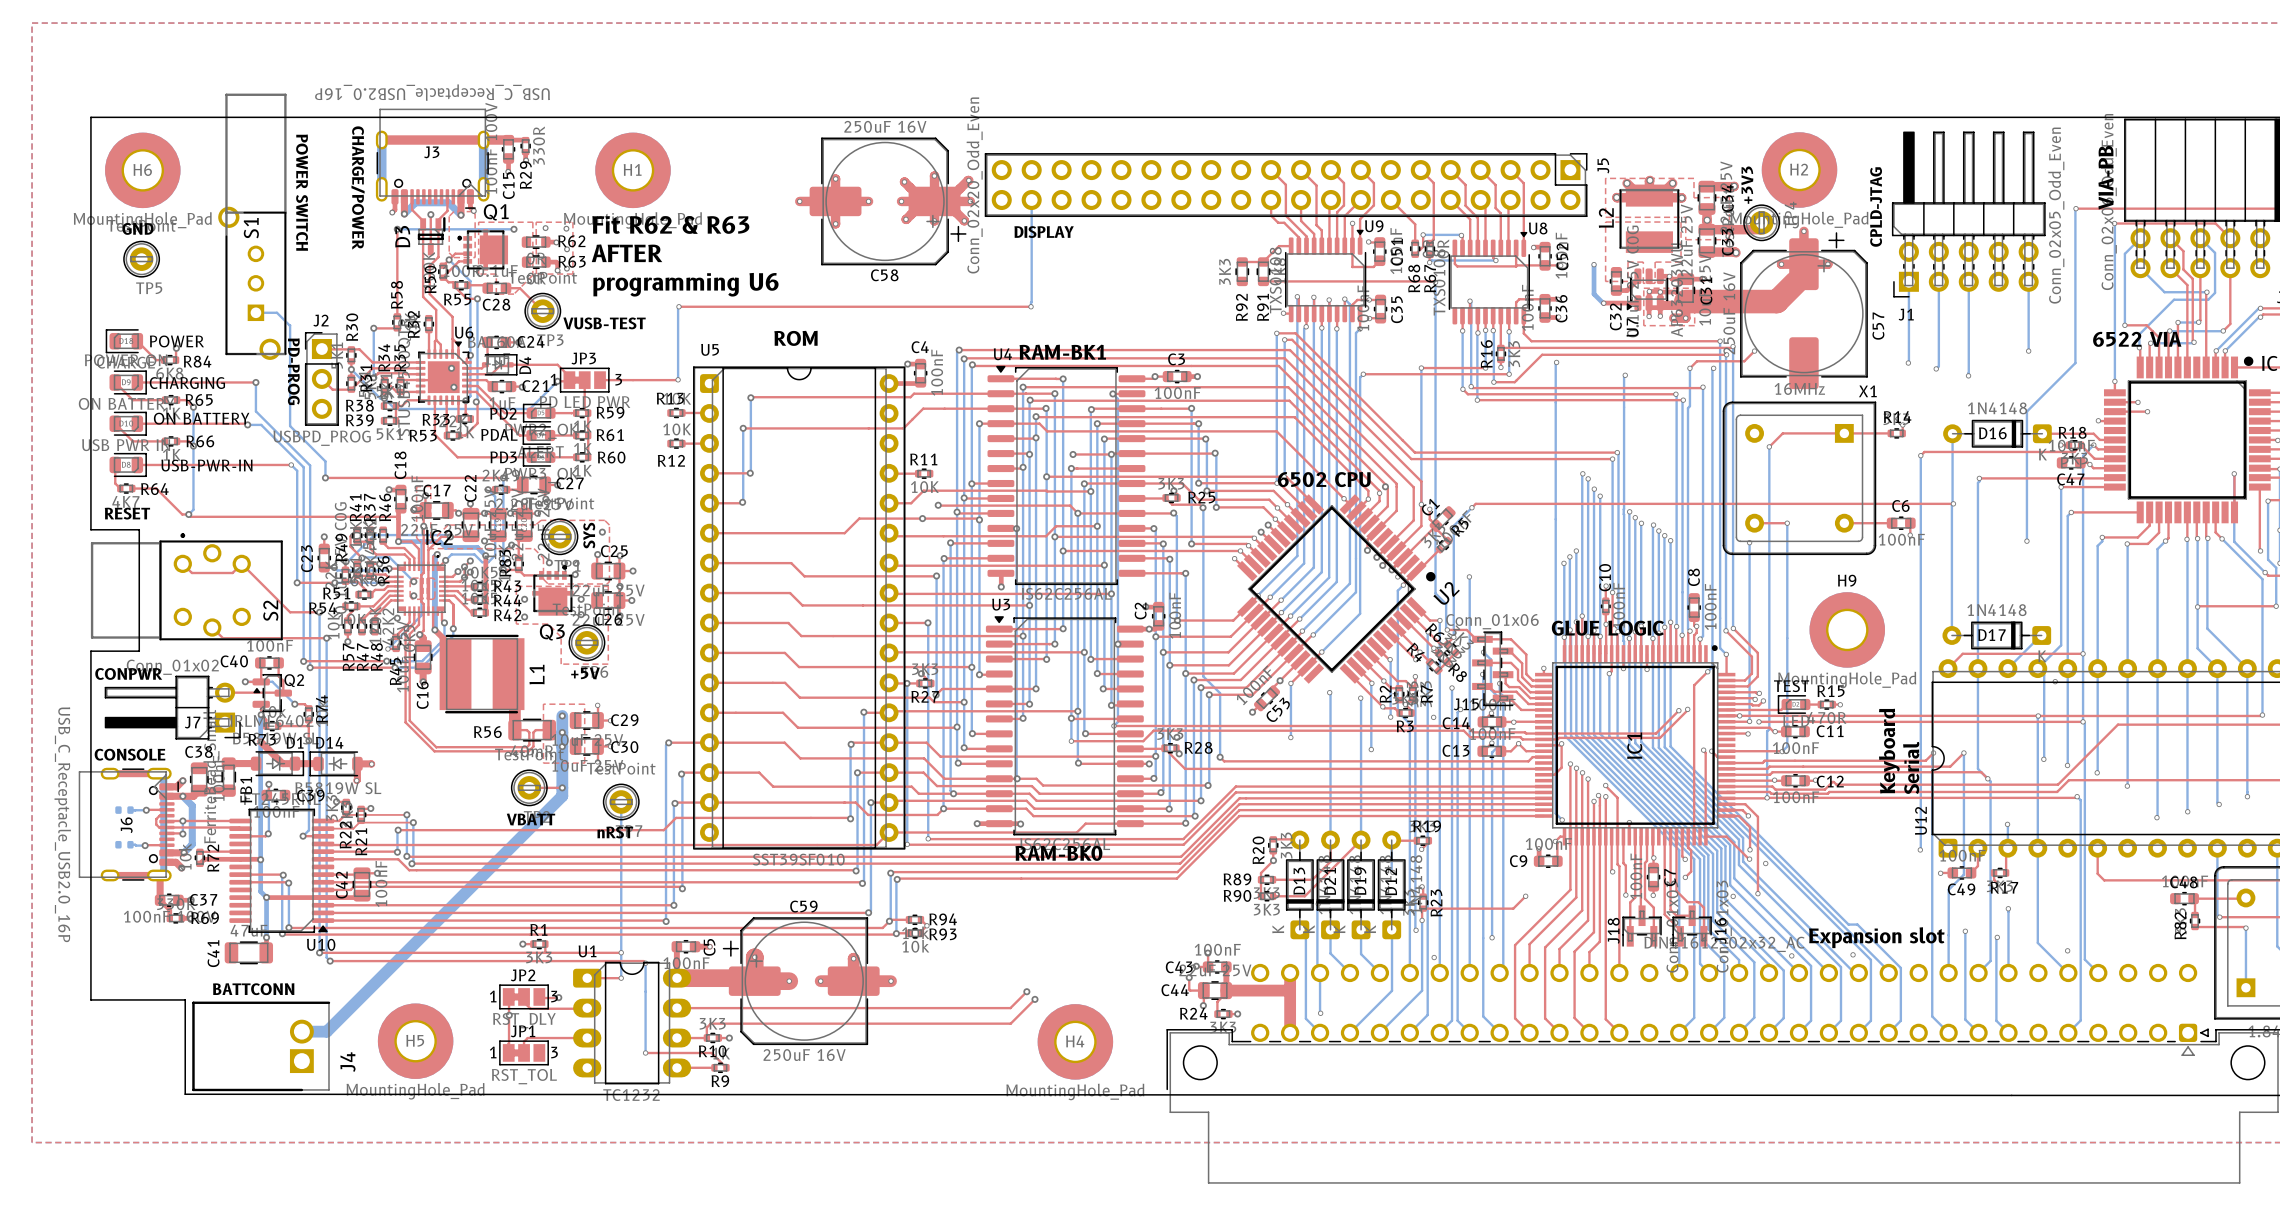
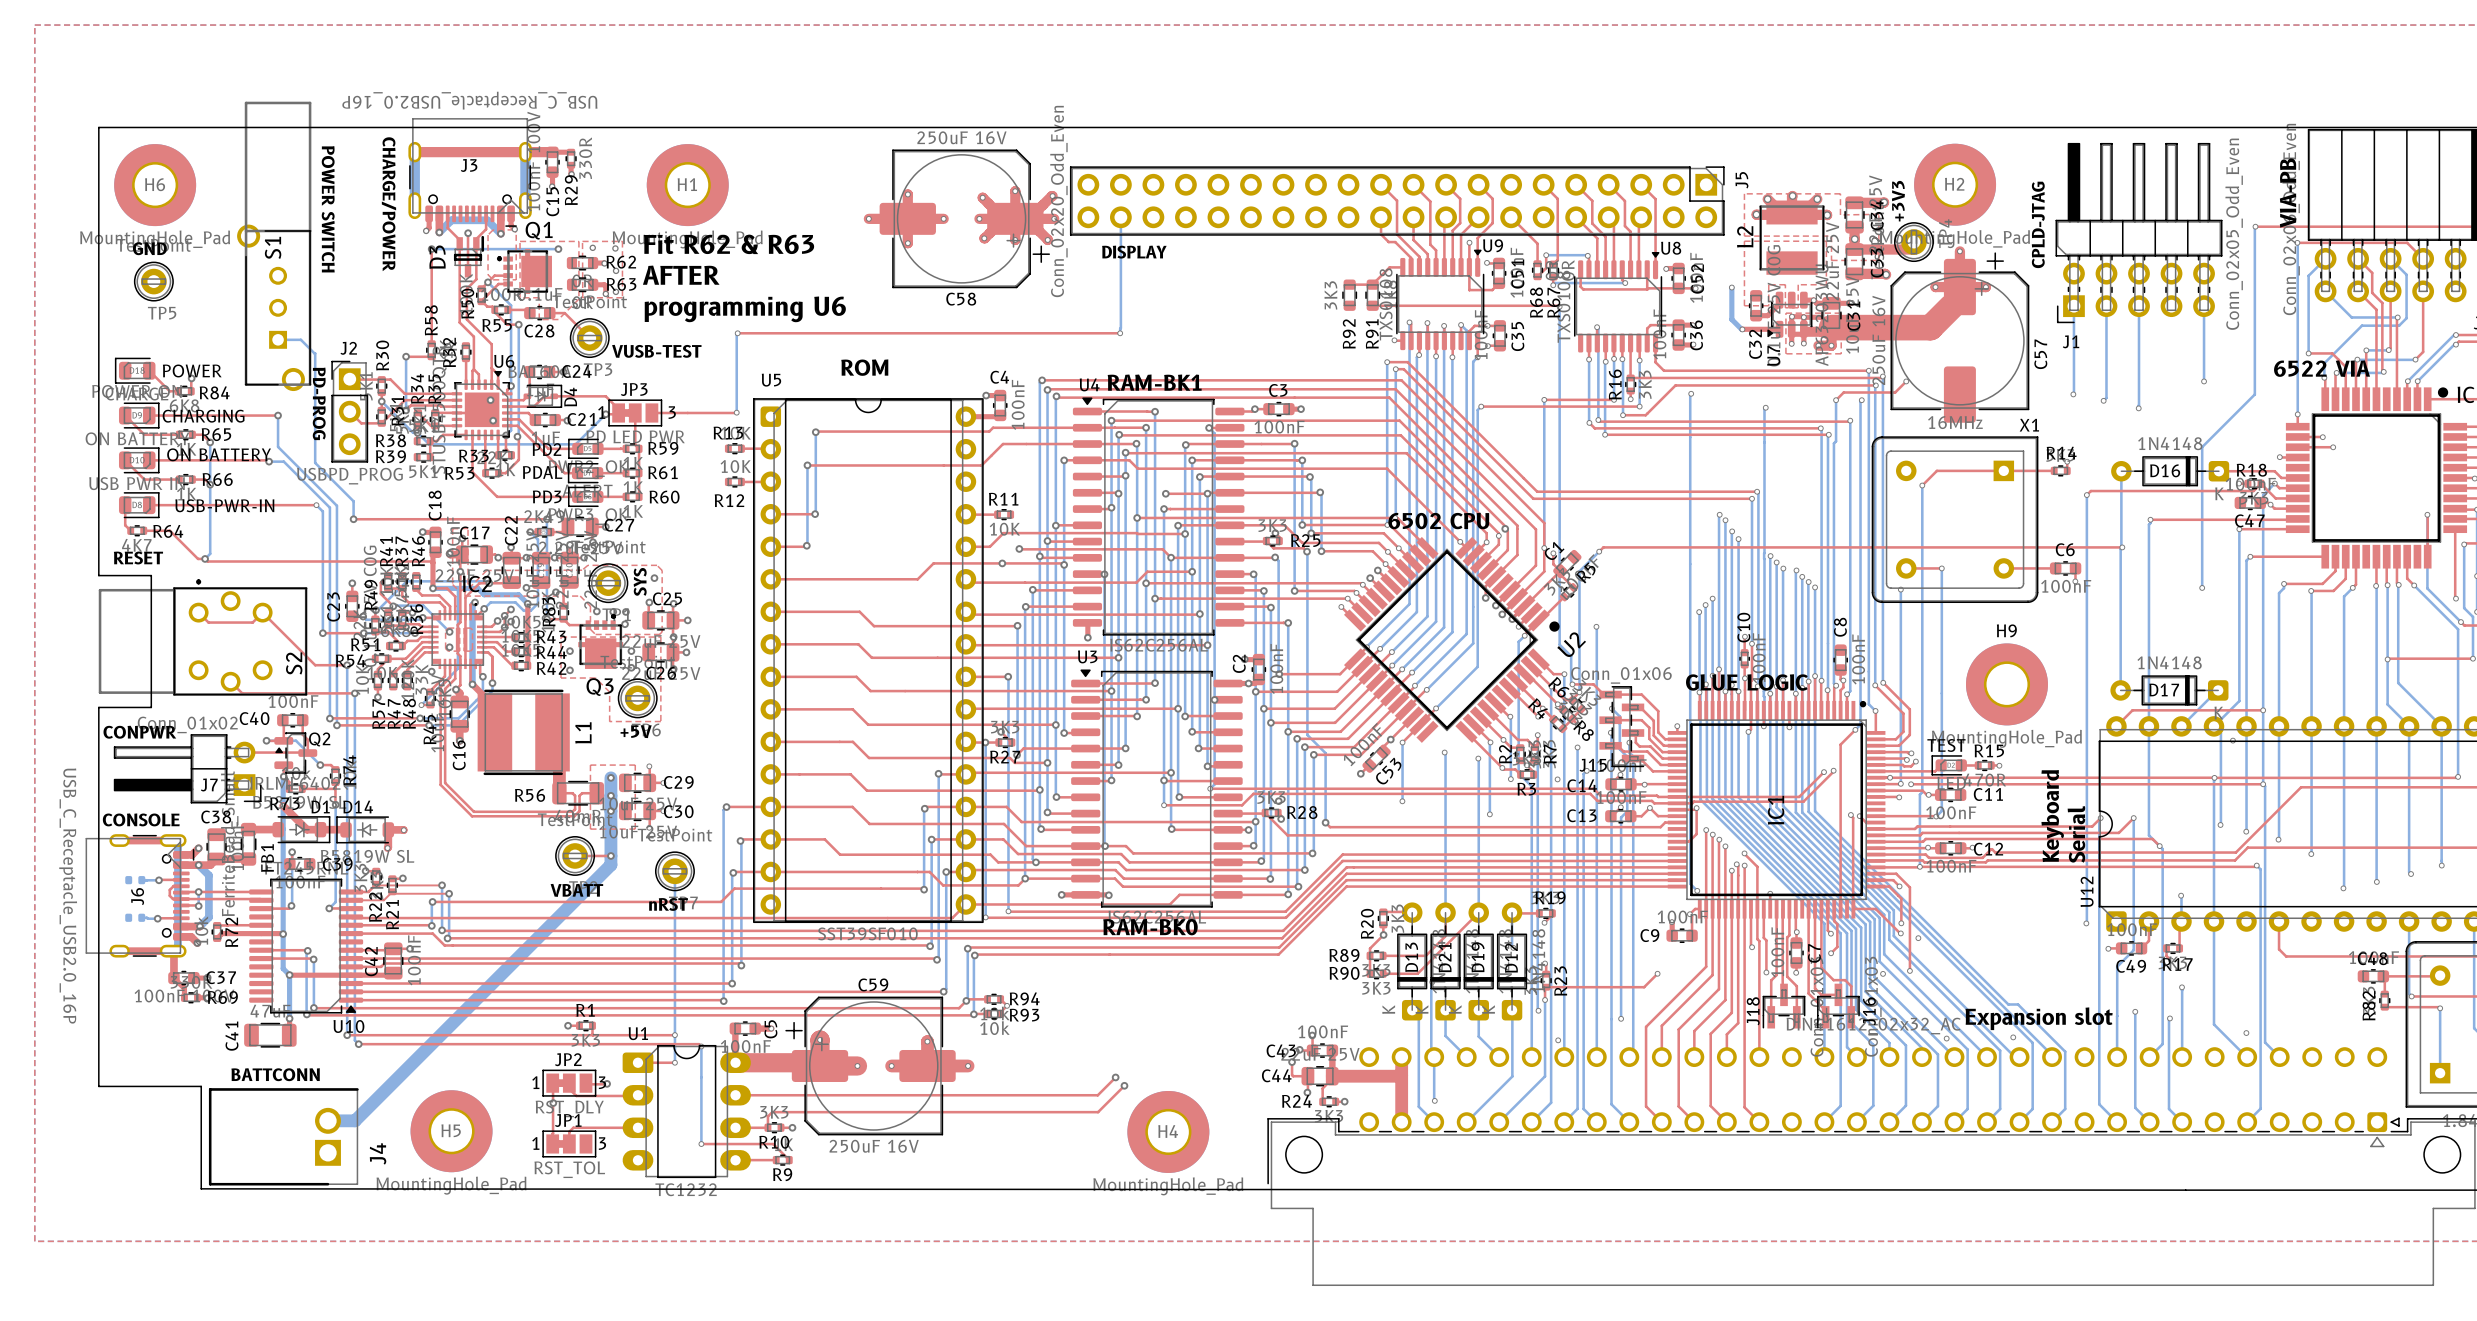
R48 value: 42K2 (388, 626) -> 33K (421, 679)

